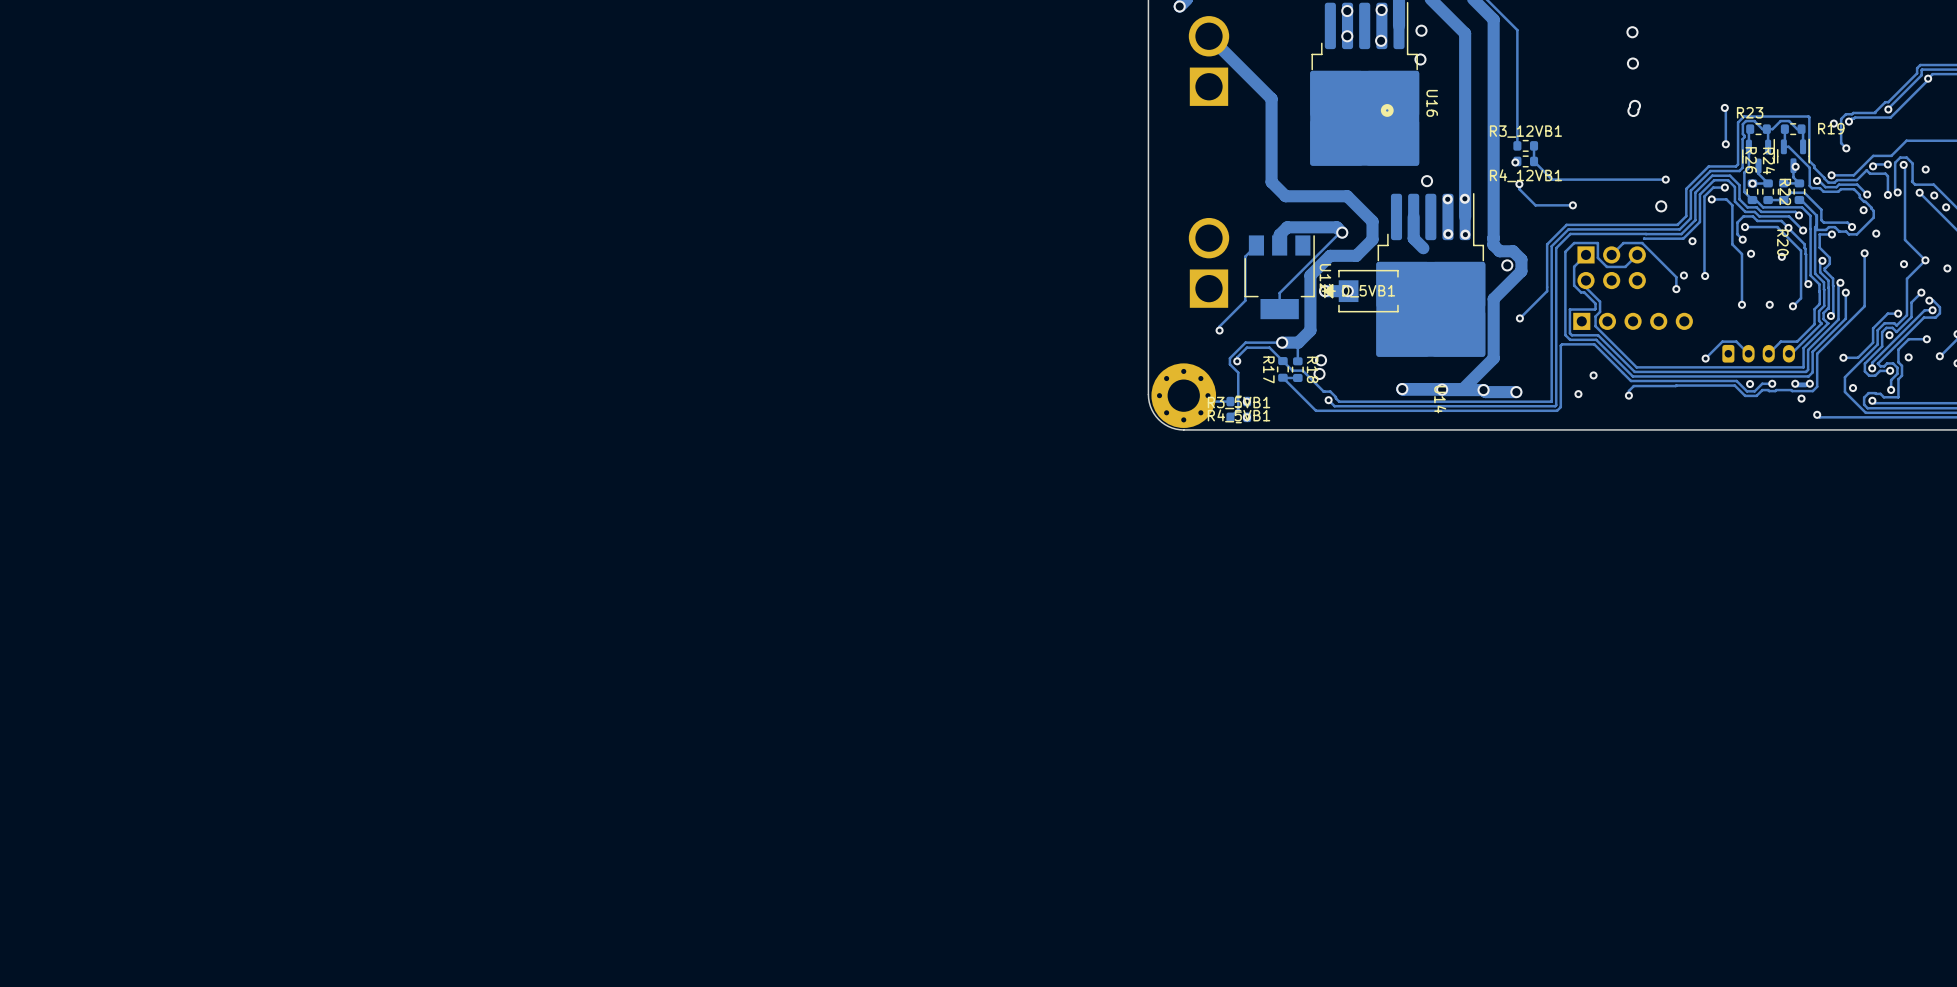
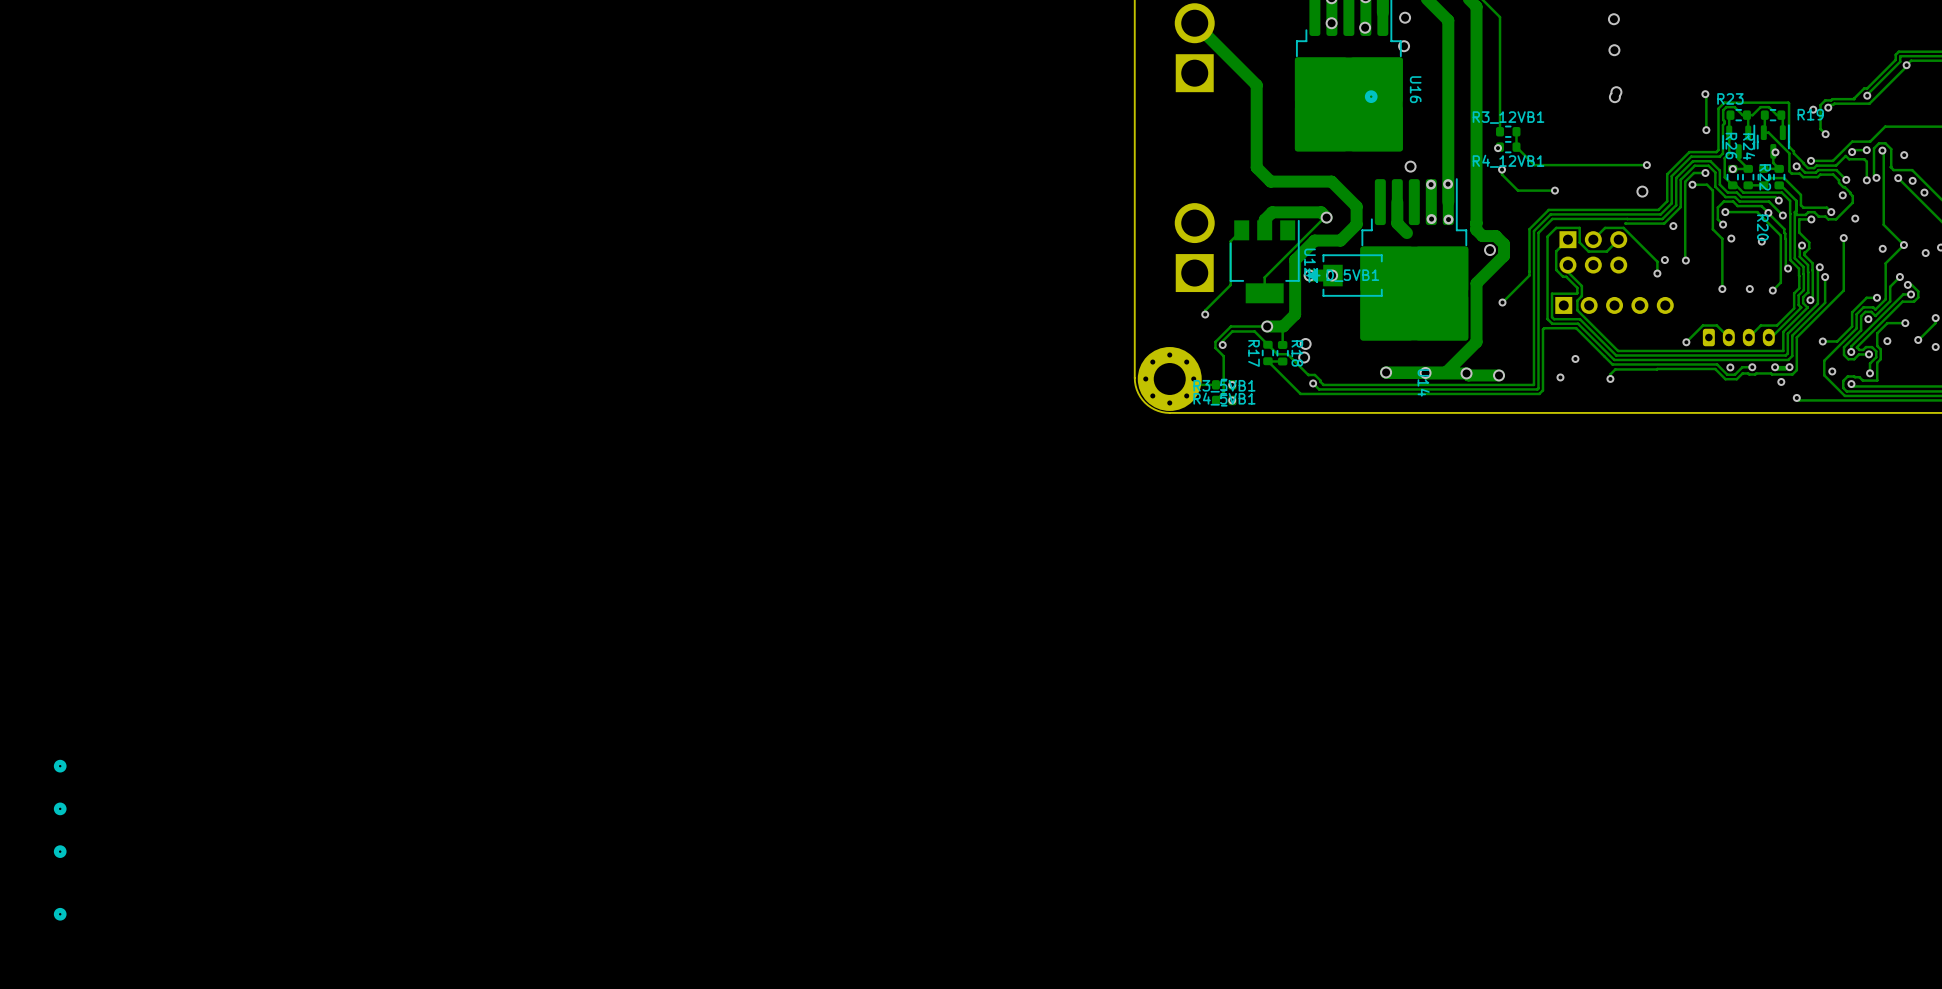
part: none -> (60, 766)
part: none -> (60, 808)
part: none -> (60, 851)
part: none -> (60, 914)

